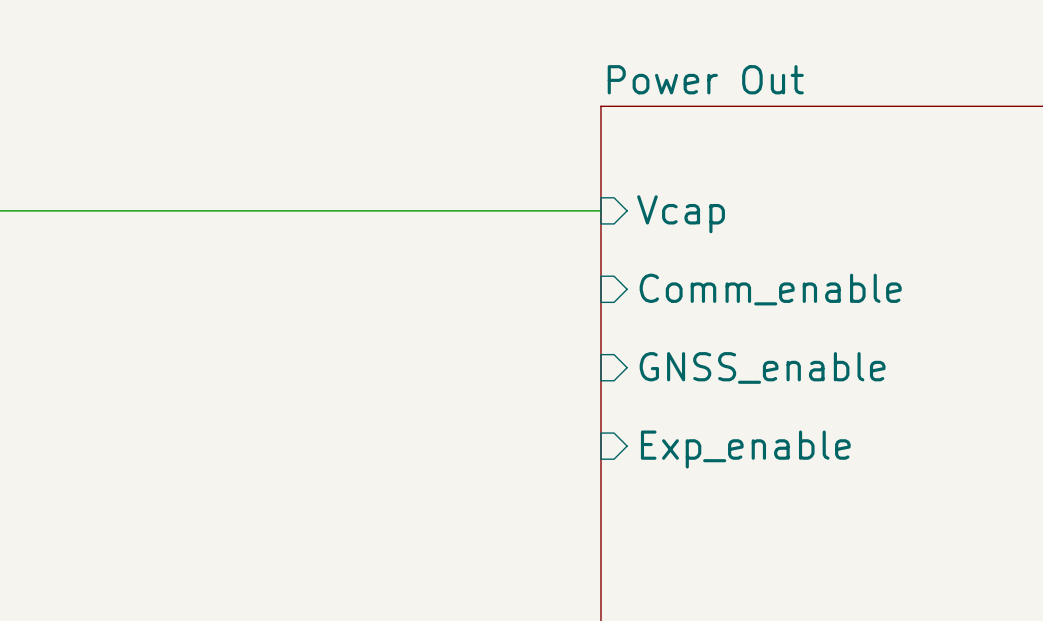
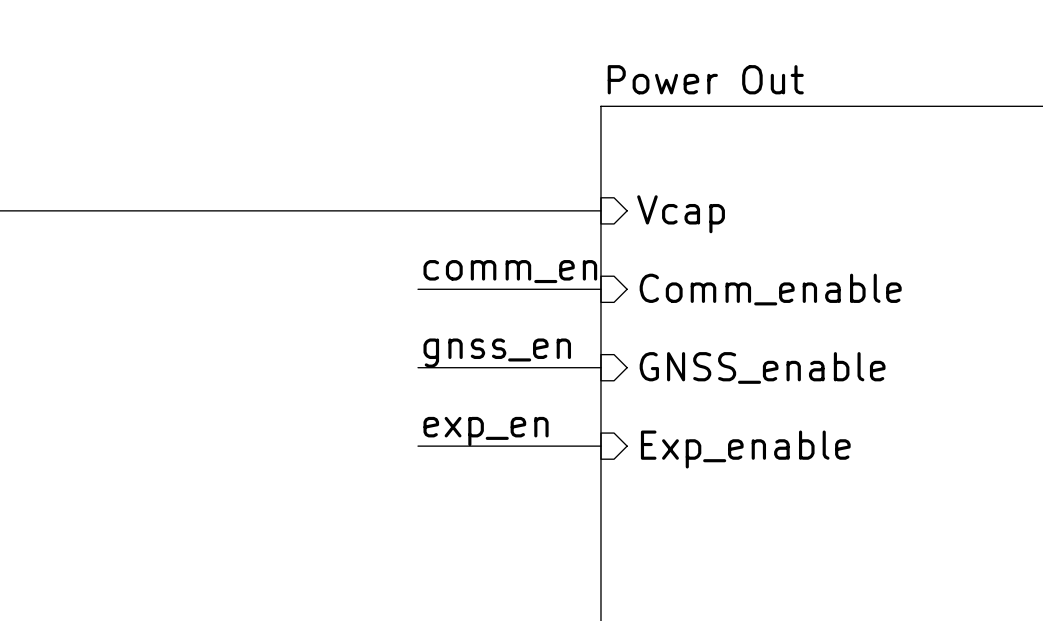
label: none -> comm_en (510, 271)
wire: none -> (418, 289) (600, 289)
label: none -> gnss_en (497, 353)
wire: none -> (418, 367) (600, 367)
label: none -> exp_en (486, 431)
wire: none -> (418, 446) (600, 446)

